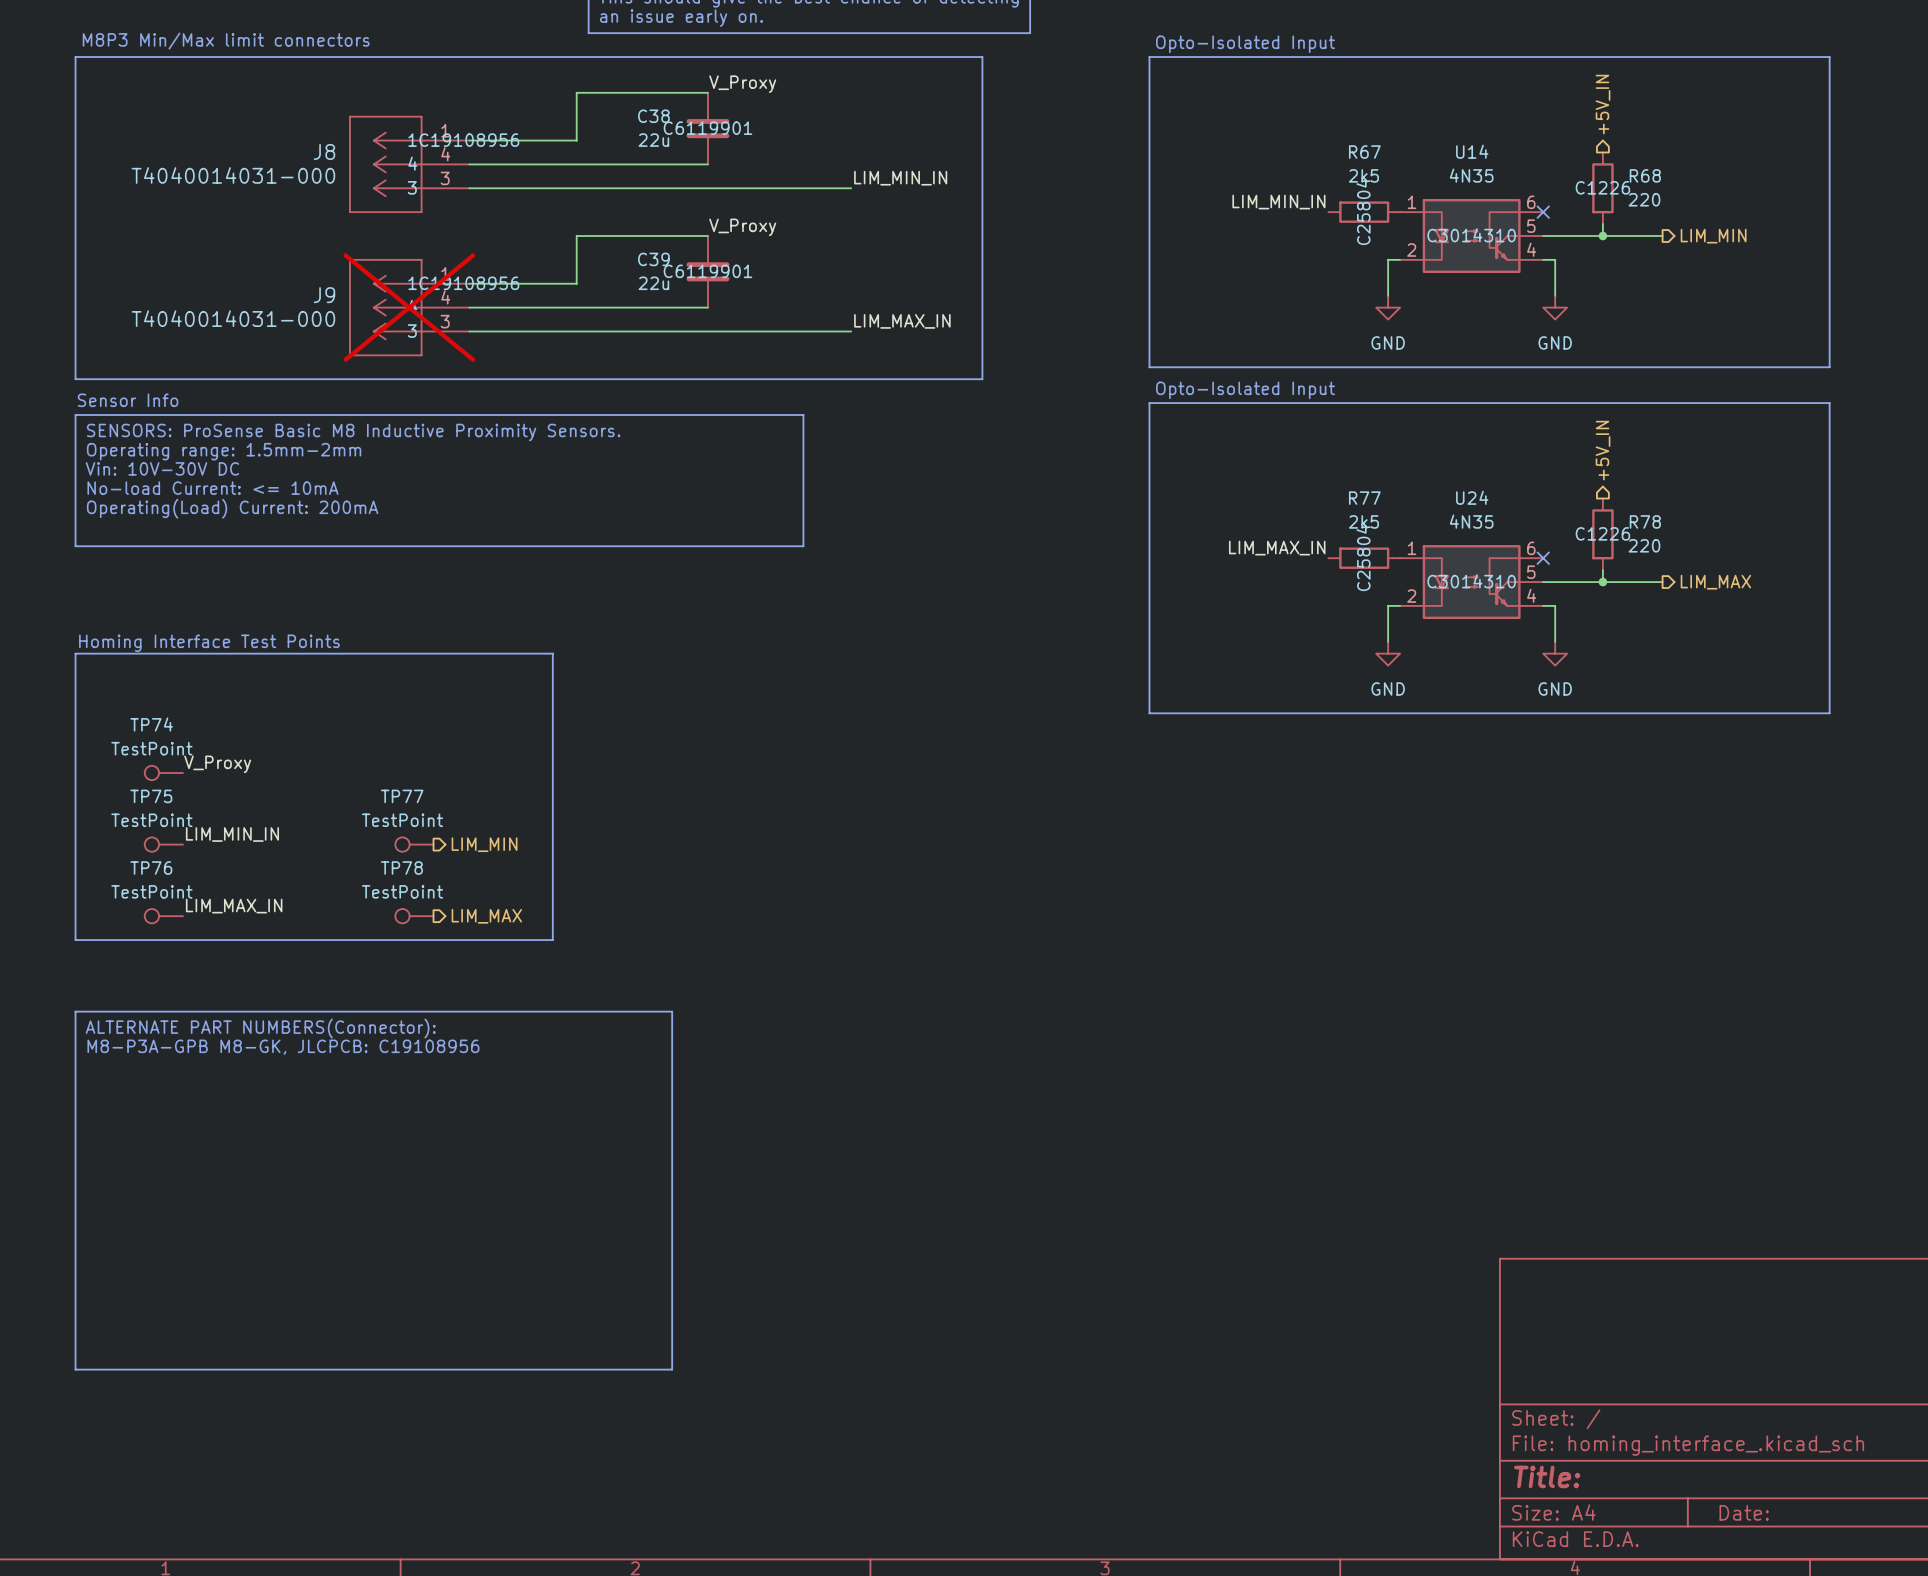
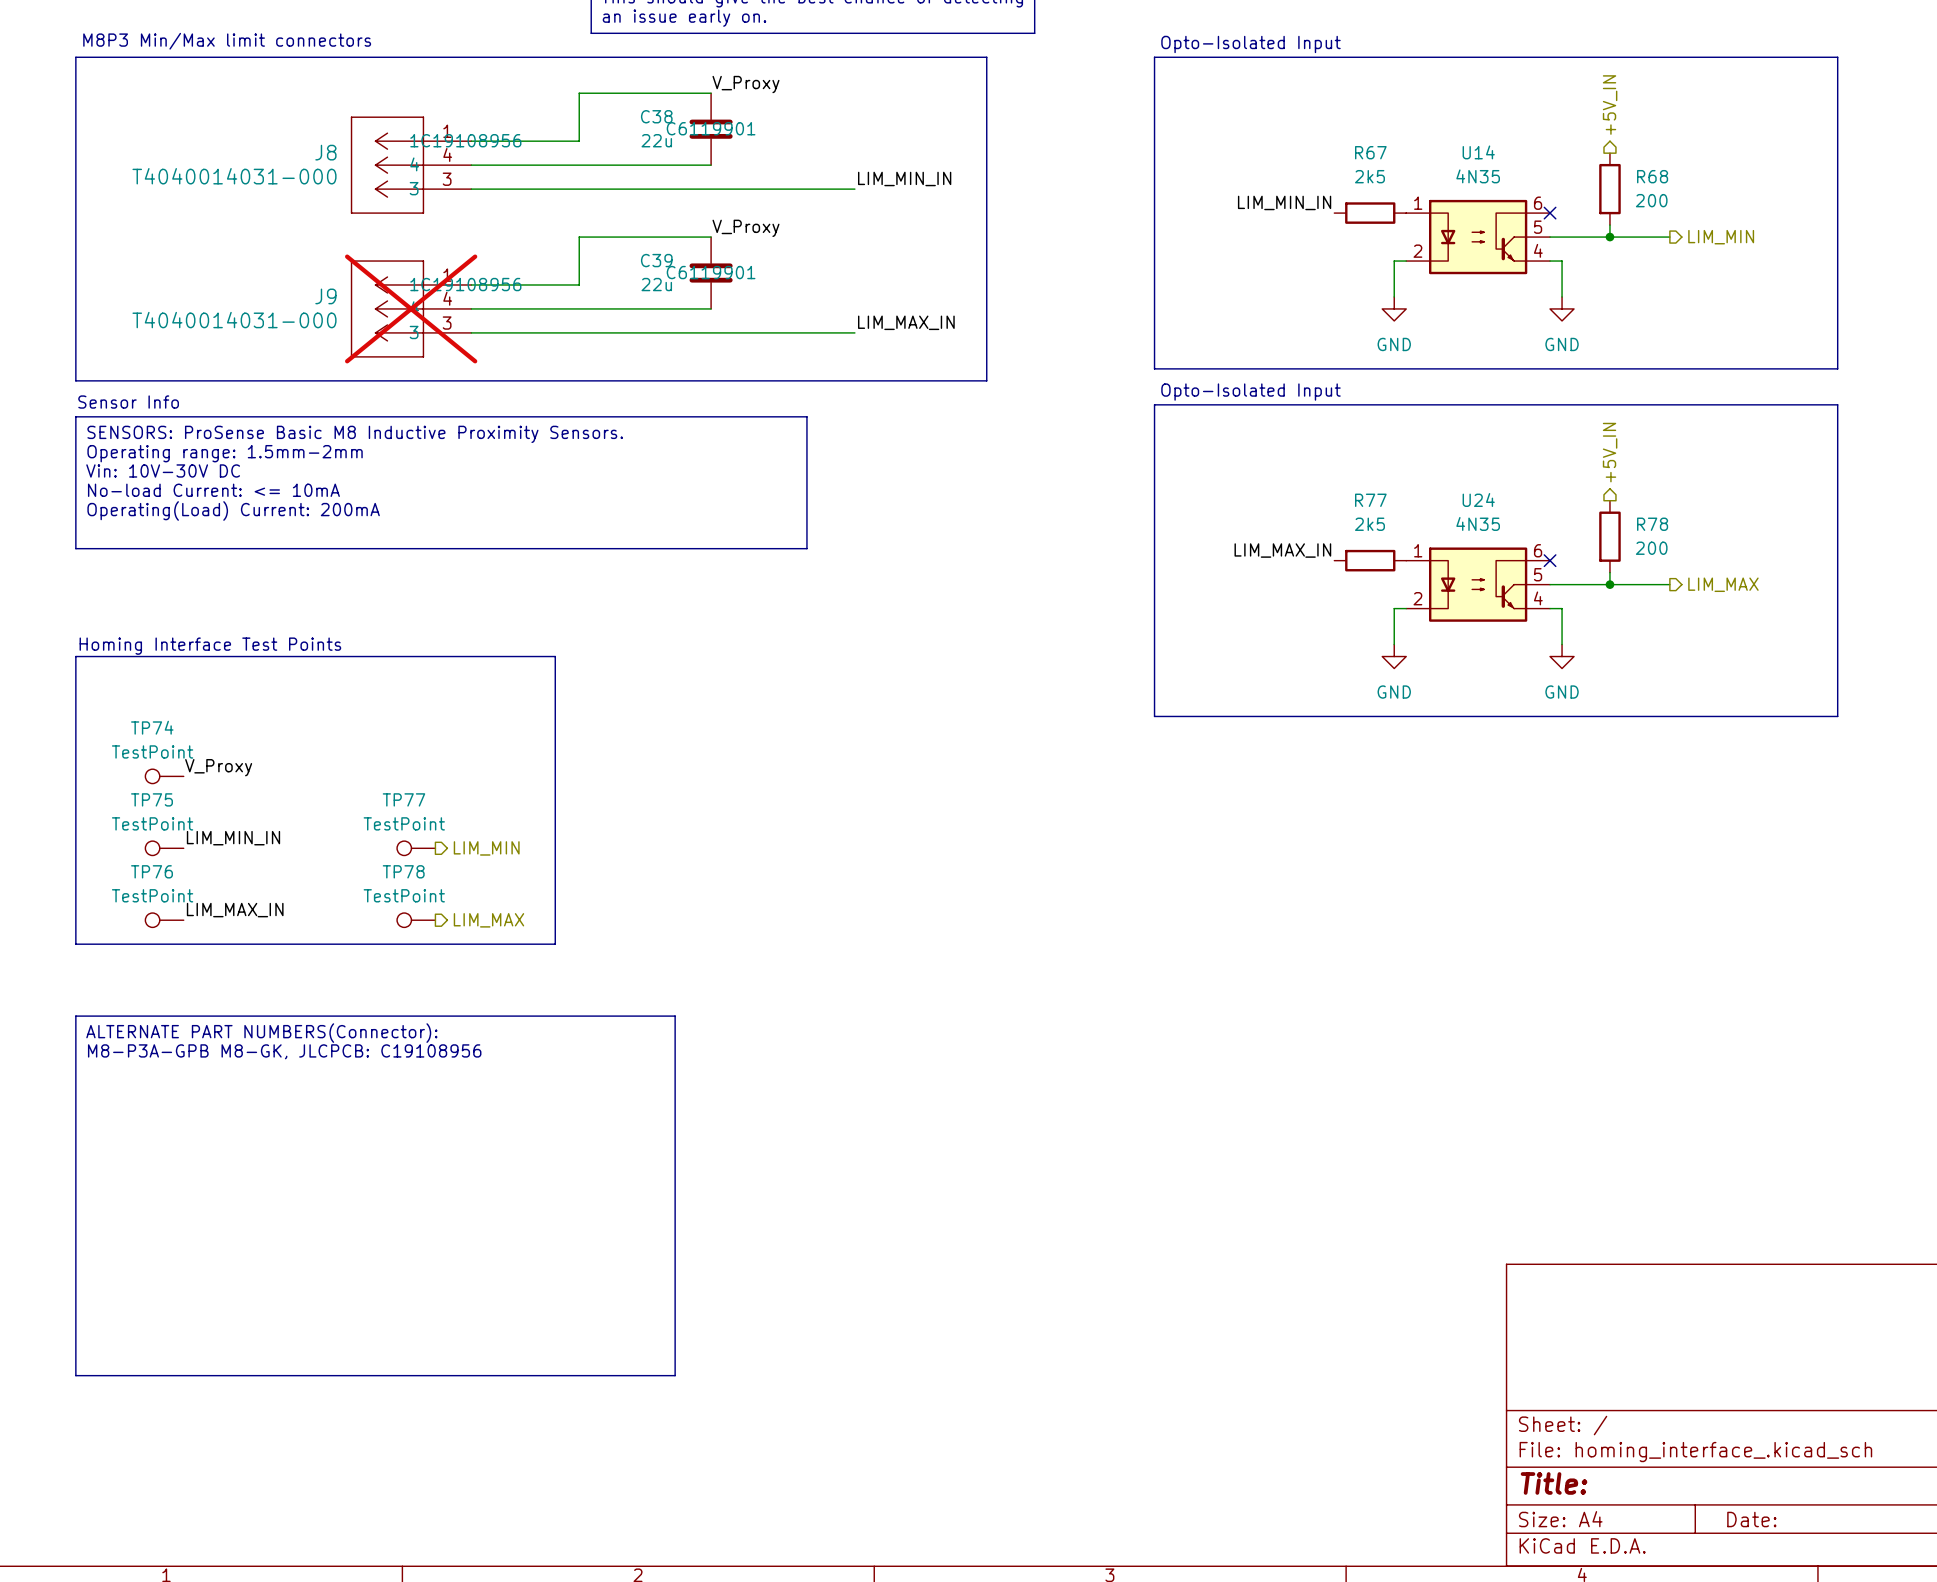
R68 text: C1226 (1602, 187) -> none
R68 value: 220 (1644, 199) -> 200 (1651, 200)
R67 text: C25804 (1363, 211) -> none
U14 text: C3014310 (1471, 235) -> none
R78 text: C1226 (1602, 533) -> none
R78 value: 220 (1644, 545) -> 200 (1651, 548)
R77 text: C25804 (1363, 557) -> none
U24 text: C3014310 (1471, 581) -> none

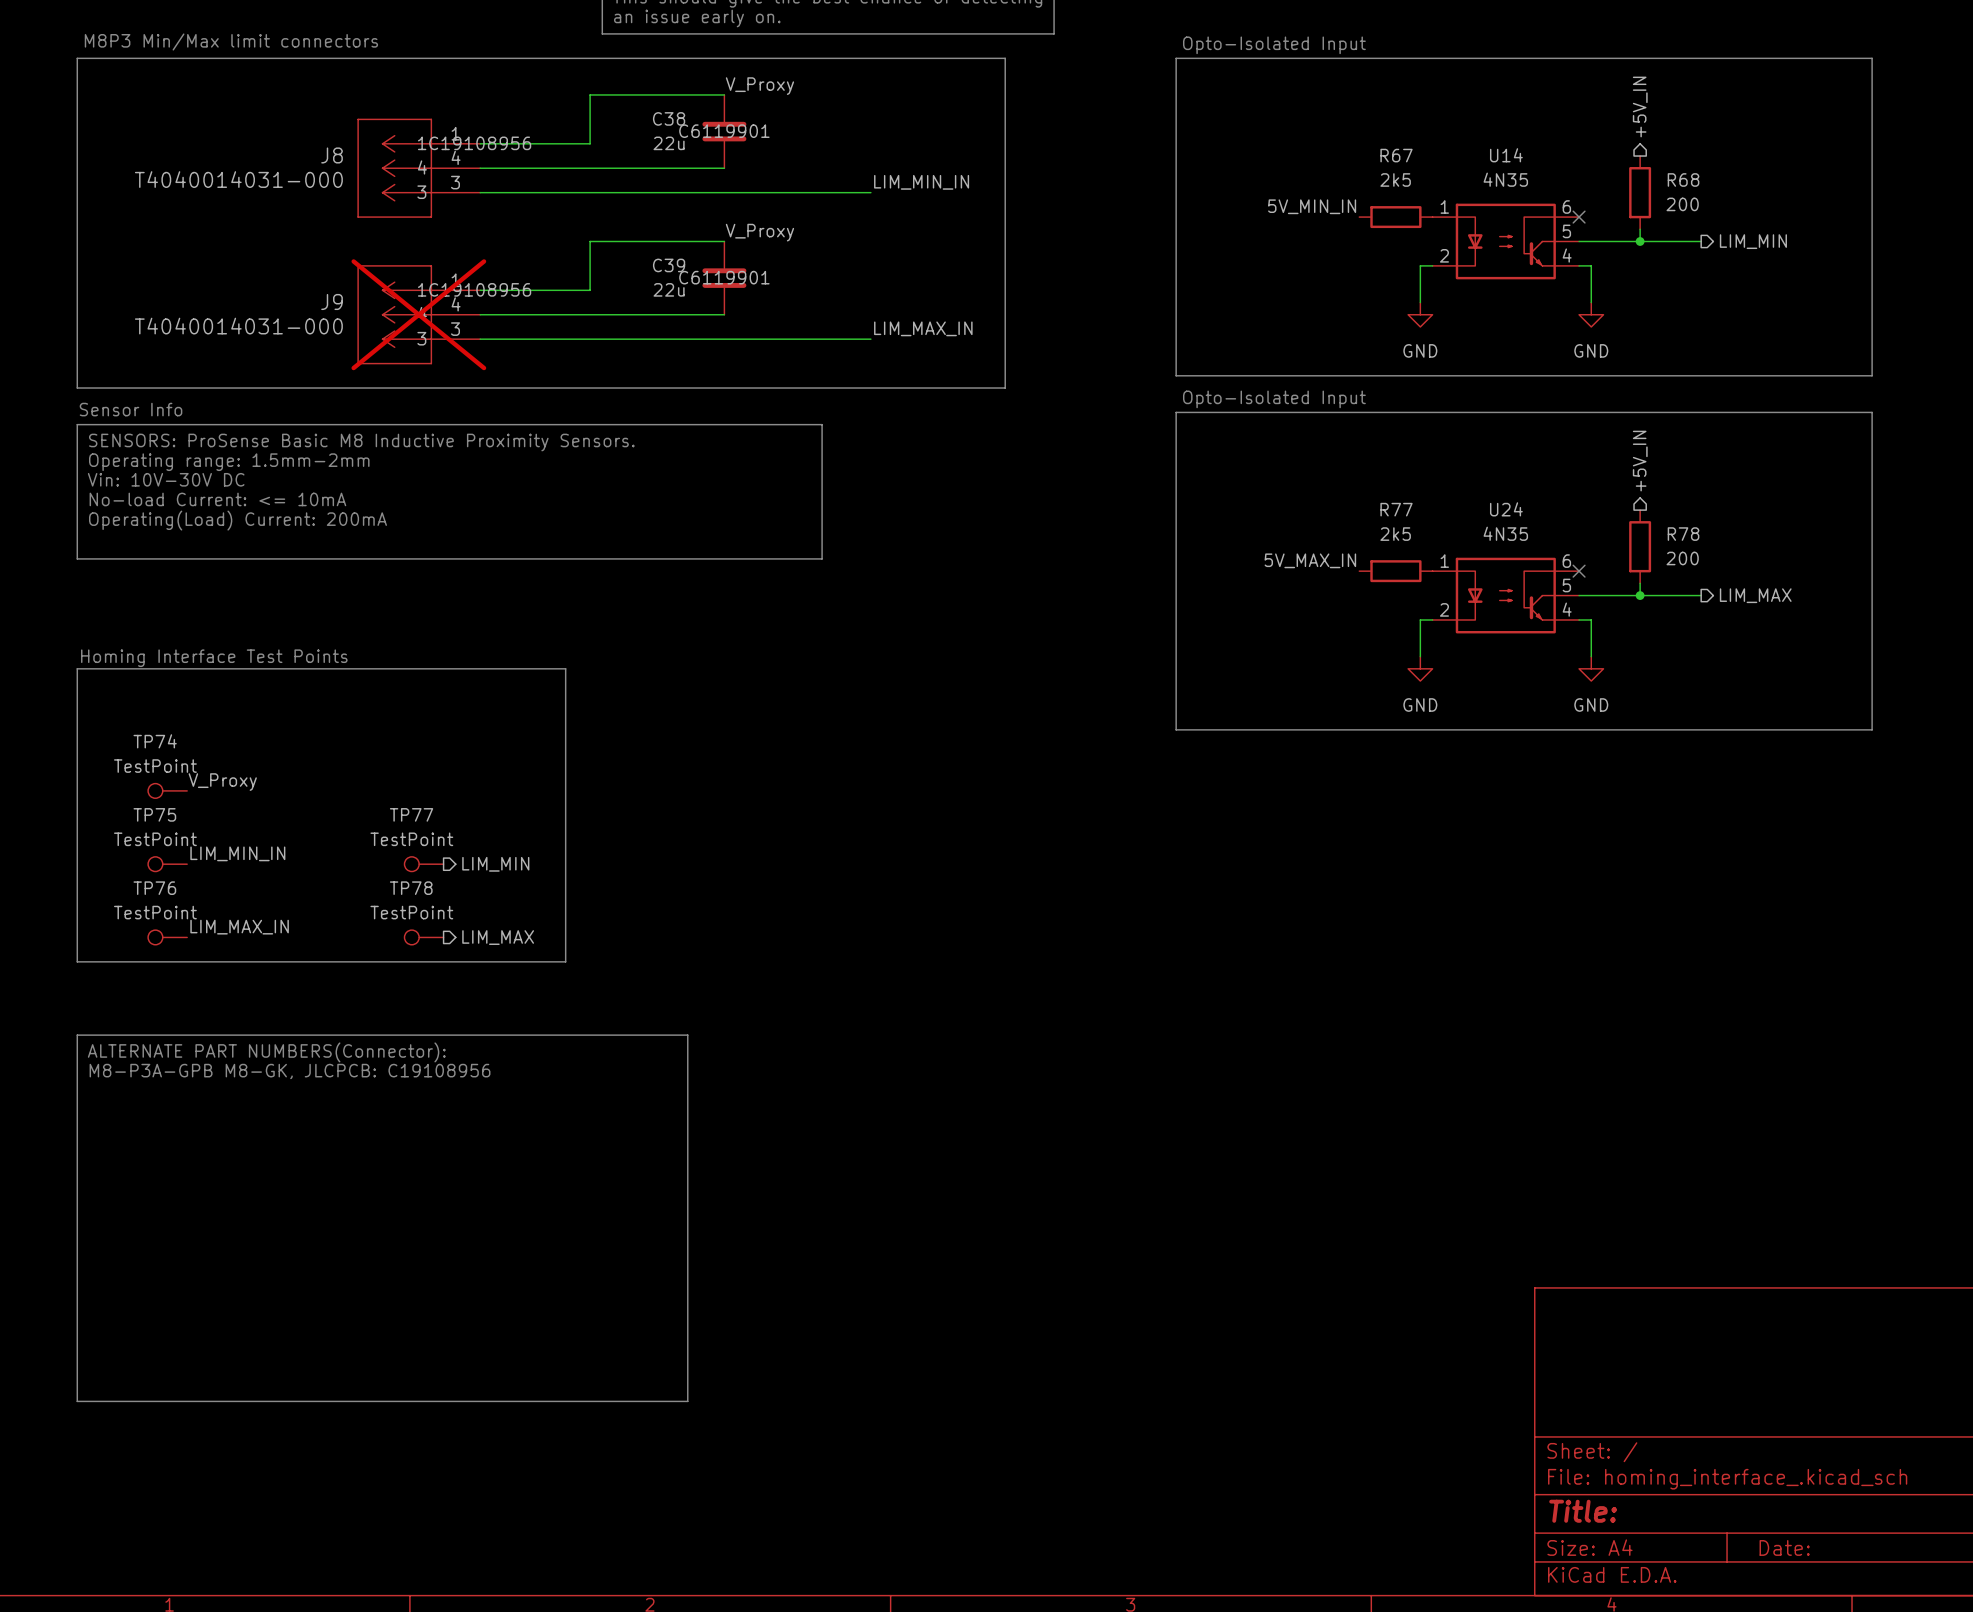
label: LIM_MIN_IN (1284, 202) -> 5V_MIN_IN (1312, 206)
label: LIM_MAX_IN (1282, 550) -> 5V_MAX_IN (1310, 560)

